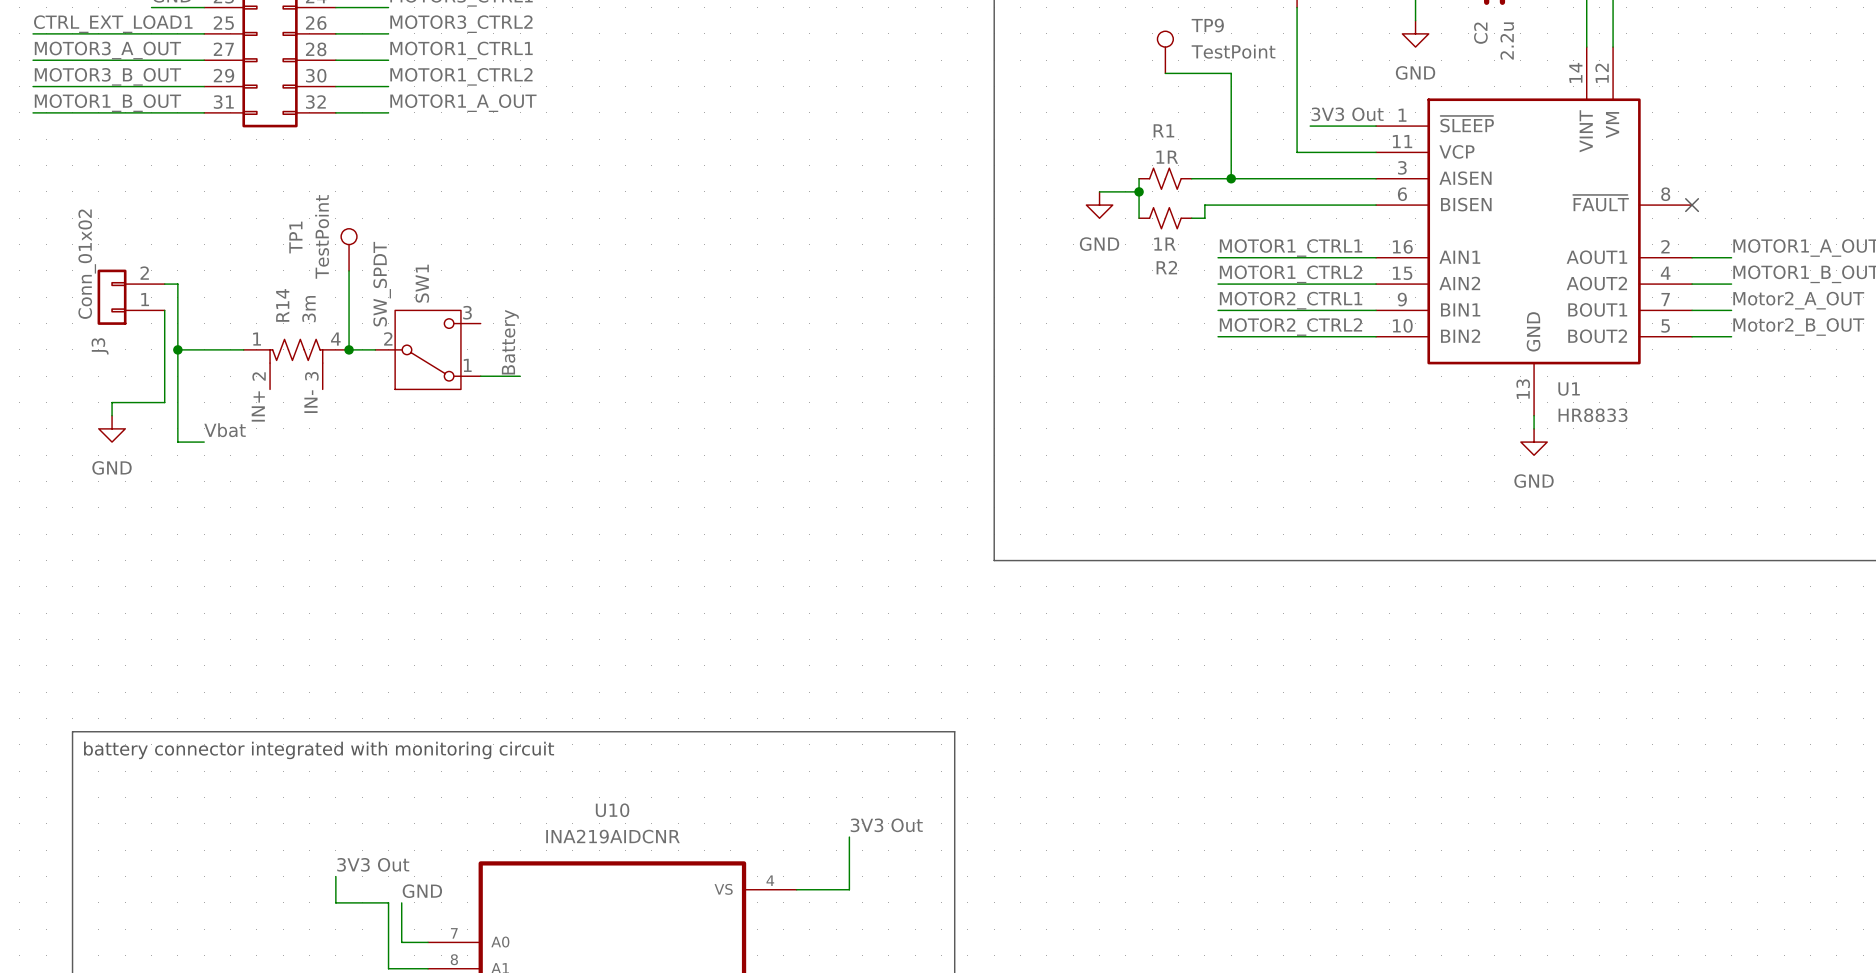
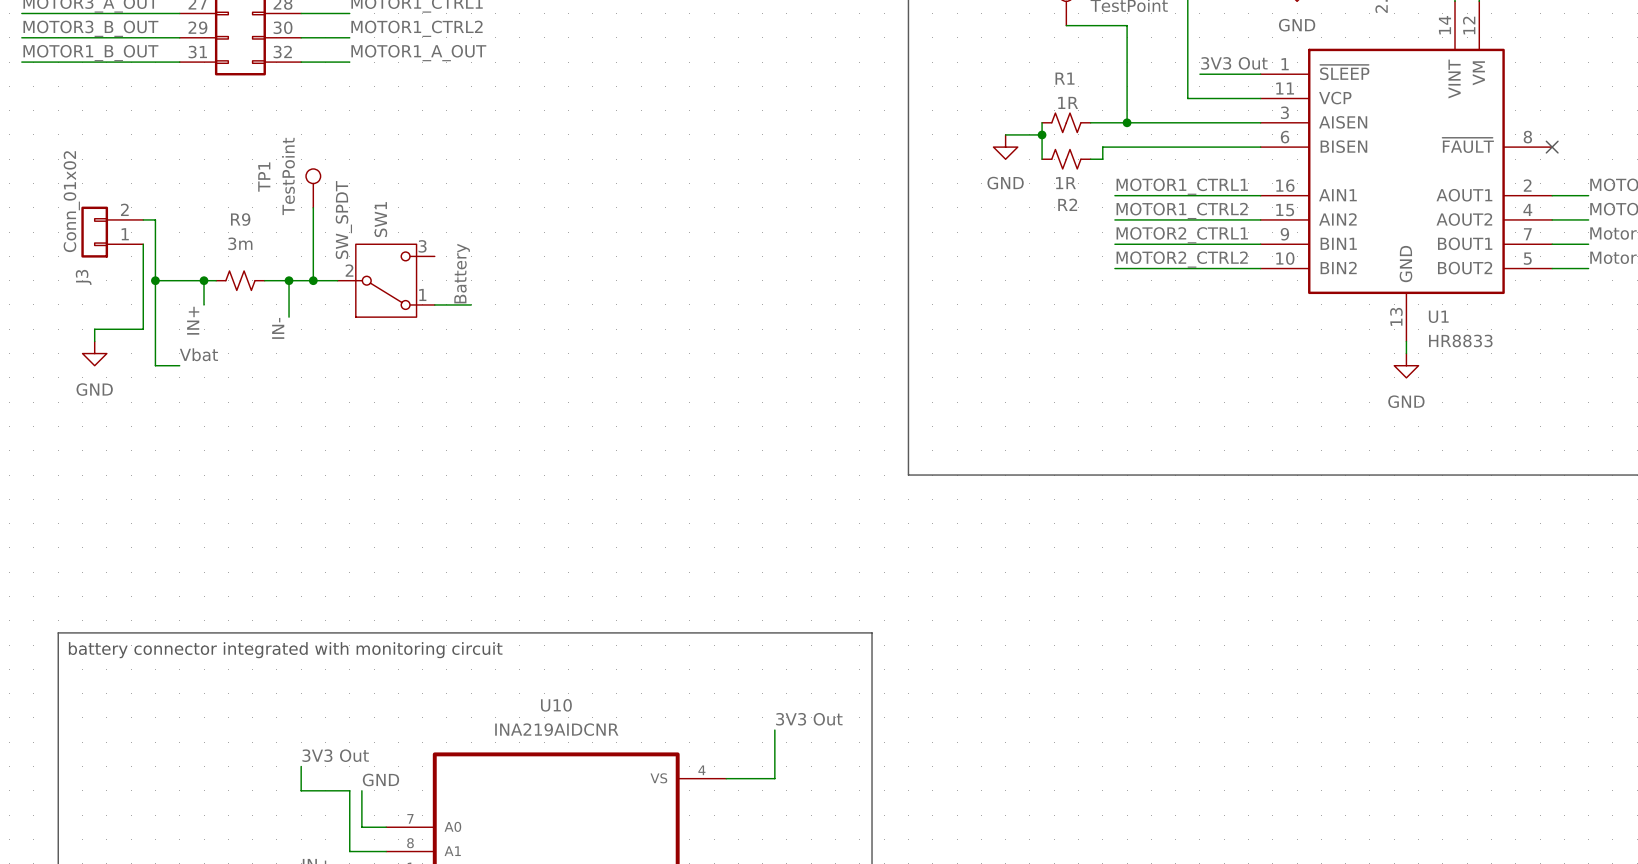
wire: none -> (204, 280) (204, 304)
junction: none -> (204, 280)
R9: none -> 3m (240, 280)
junction: none -> (289, 280)
R14: 3m (296, 364) -> none
label position: IN+ (258, 406) -> IN+ (193, 320)

